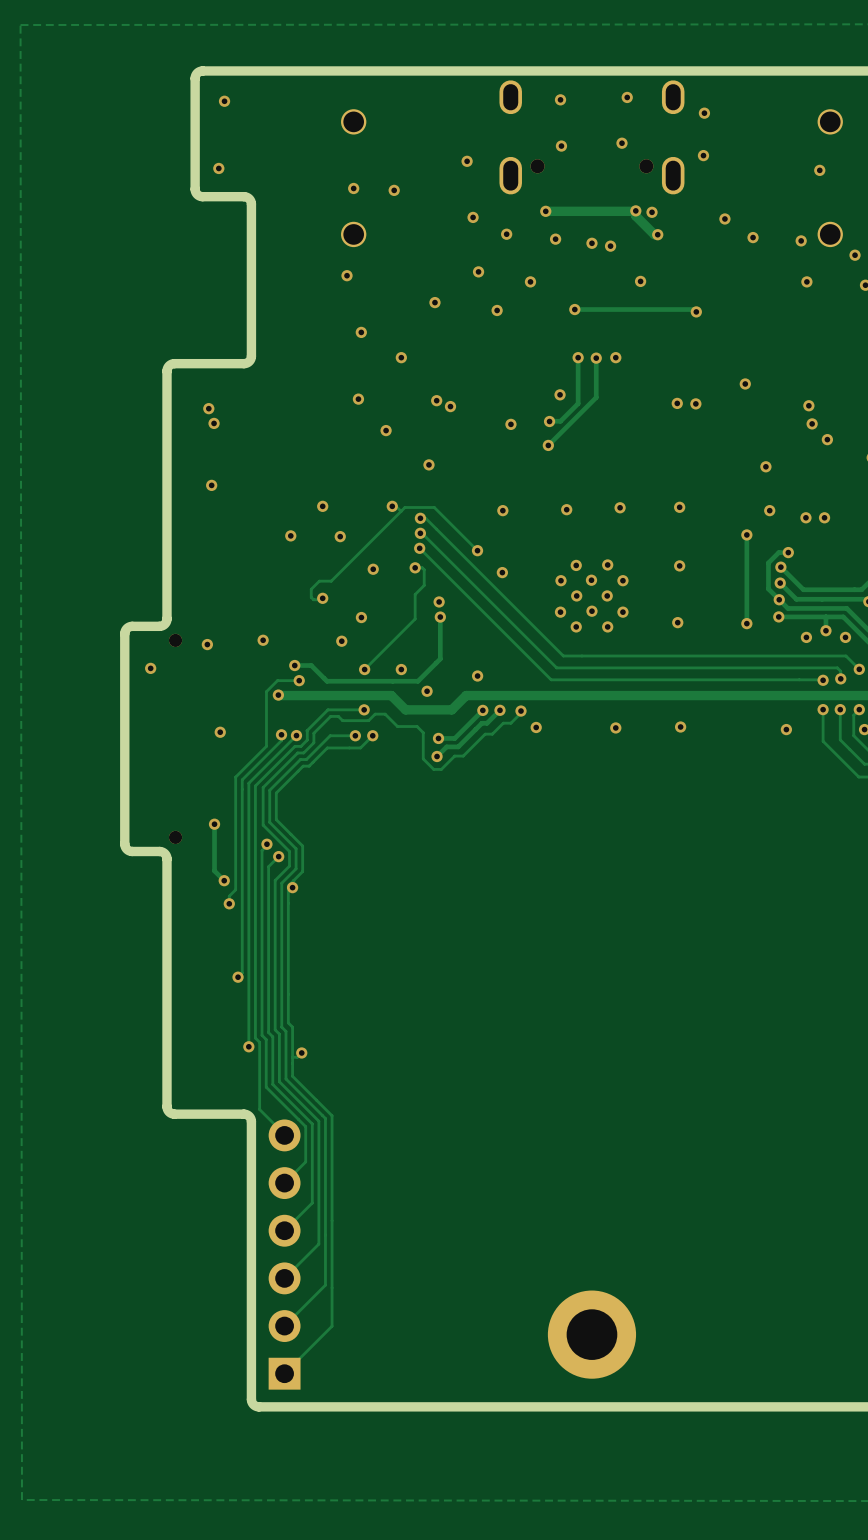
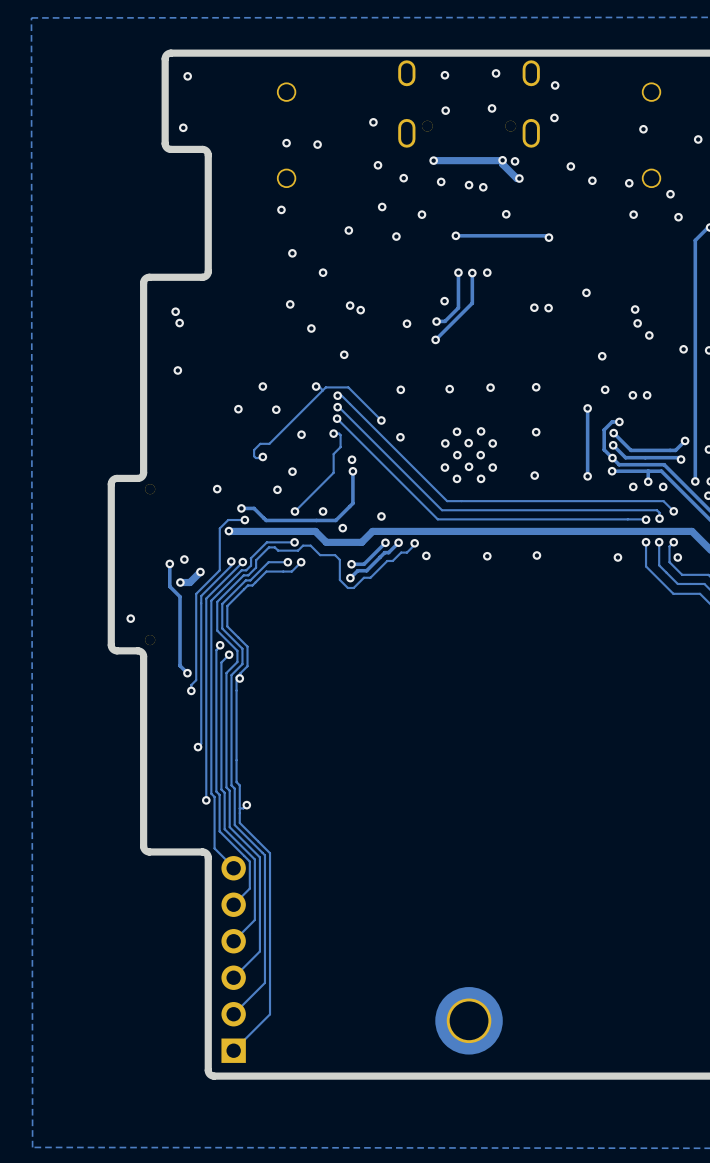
via: (207, 644) -> none
via: (150, 668) -> none
track: none -> (169, 563) (169, 586) (180, 596) (180, 629)
via: none -> (169, 563)
track: none -> (200, 572) (189, 582) (180, 582)
via: none -> (200, 572)
via: none -> (180, 582)
via: none -> (130, 618)
via: (214, 824) -> none

